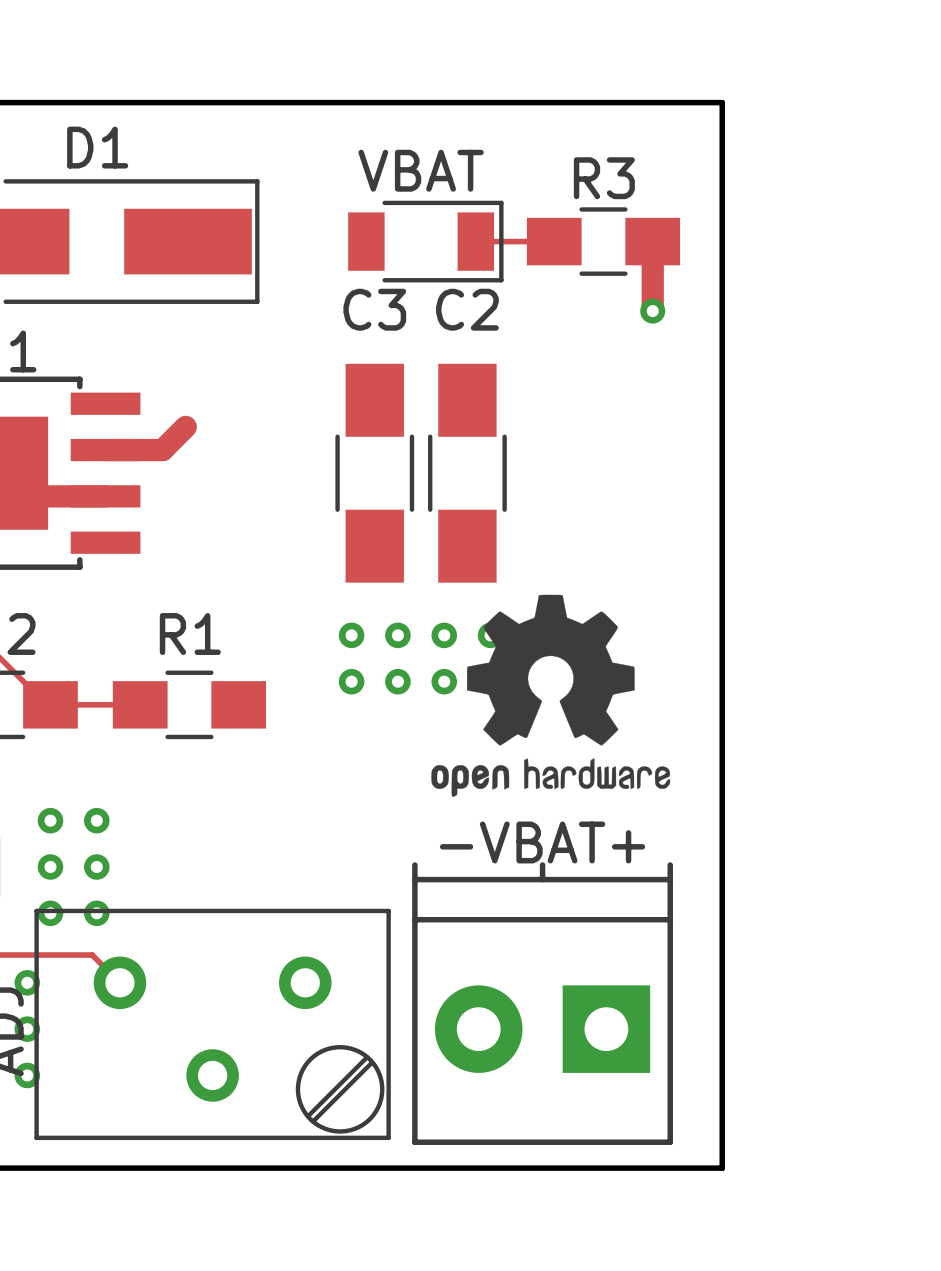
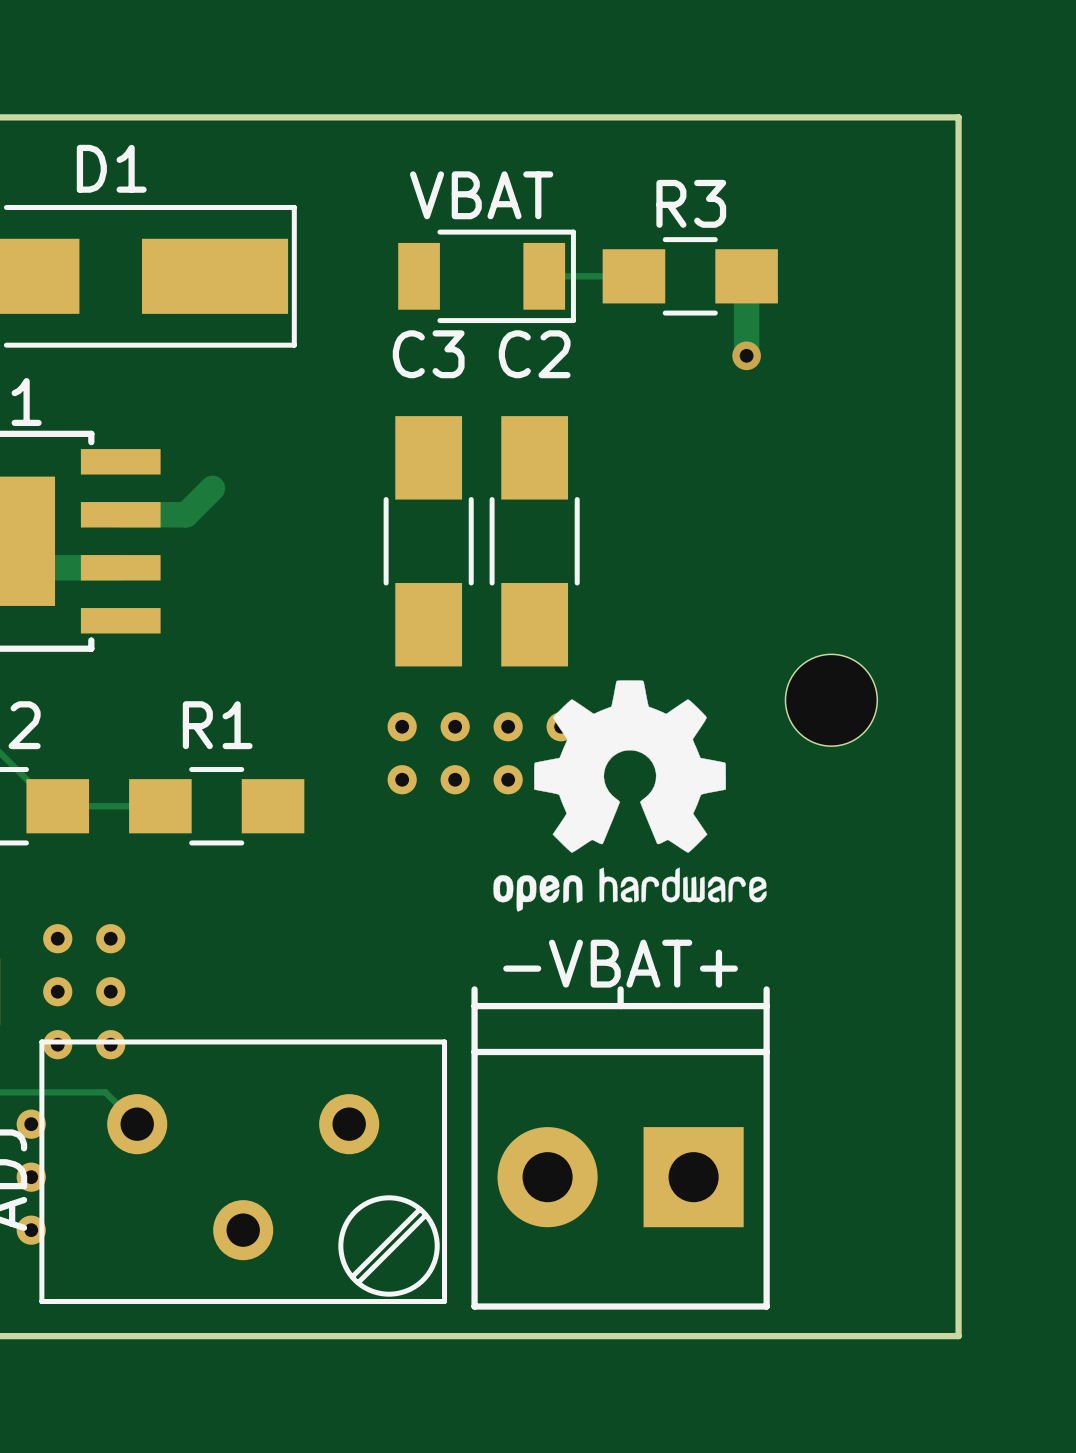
board edge: (722, 102) (722, 1168) -> (826, 117) (958, 117) (958, 1336) (826, 1336)
part: none -> (831, 700)

